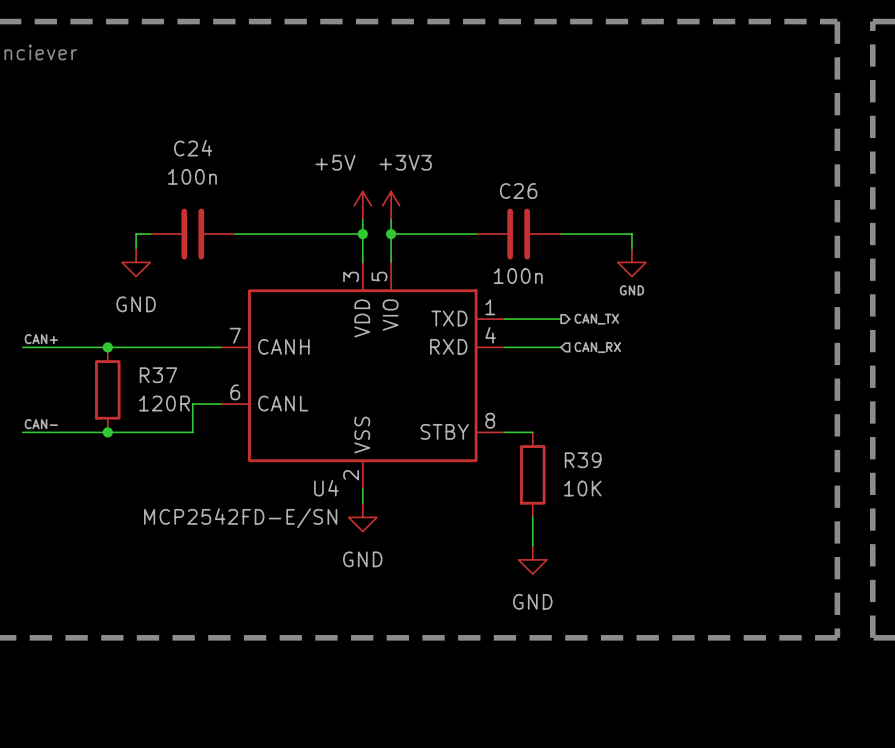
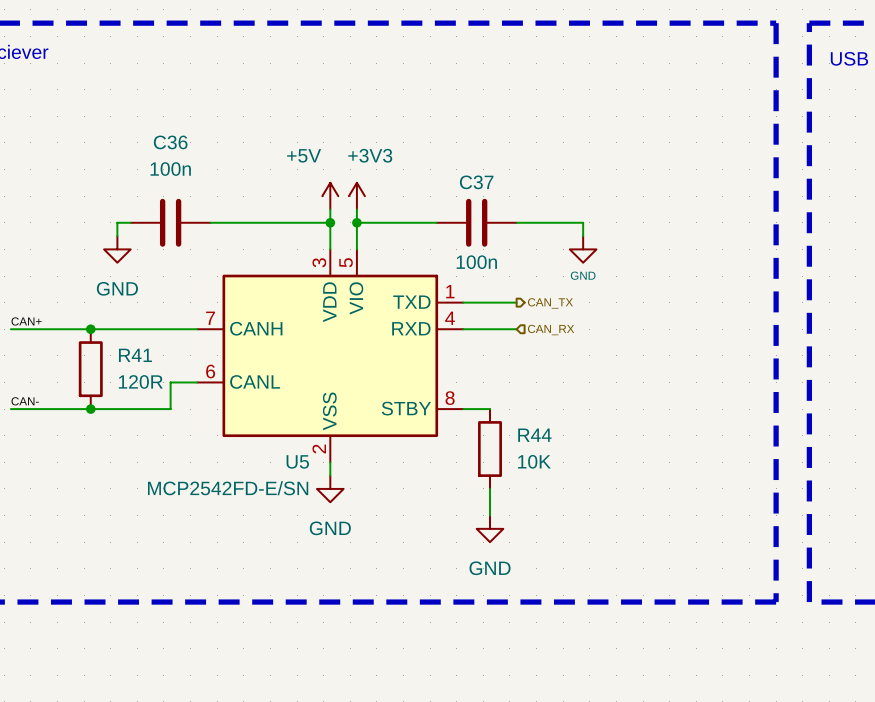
C24 name: C24 (193, 148) -> C36 (170, 142)
C26 name: C26 (518, 191) -> C37 (476, 182)
R37 name: R37 (158, 375) -> R41 (135, 355)
R39 name: R39 (583, 460) -> R44 (534, 435)
U4 name: U4 (326, 488) -> U5 (297, 461)

